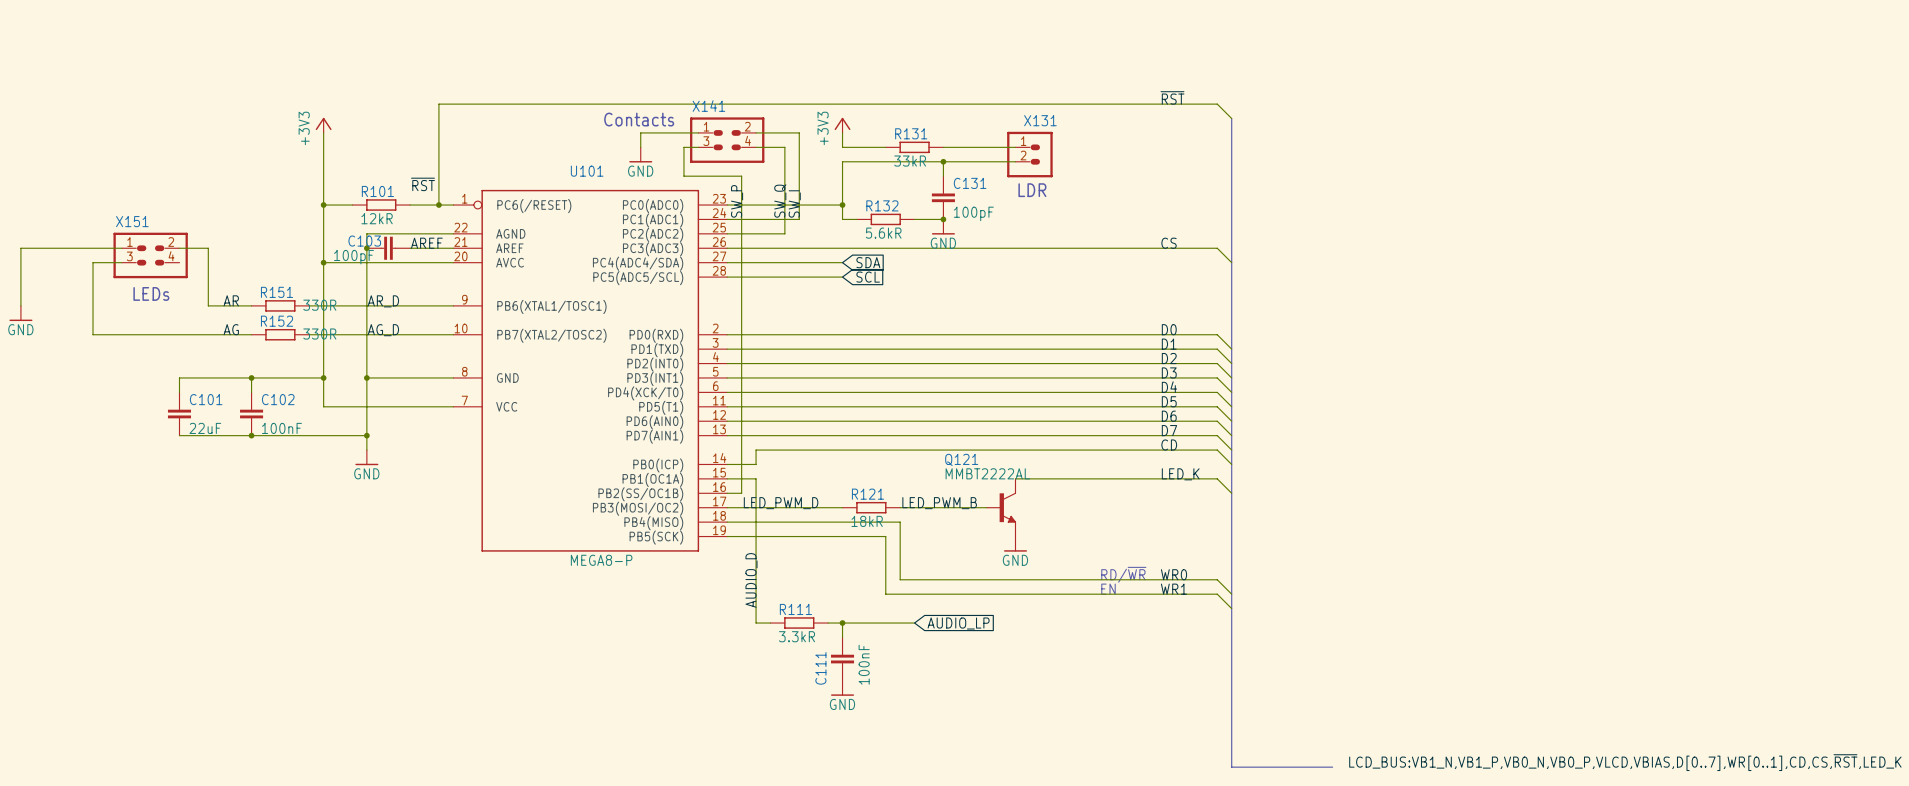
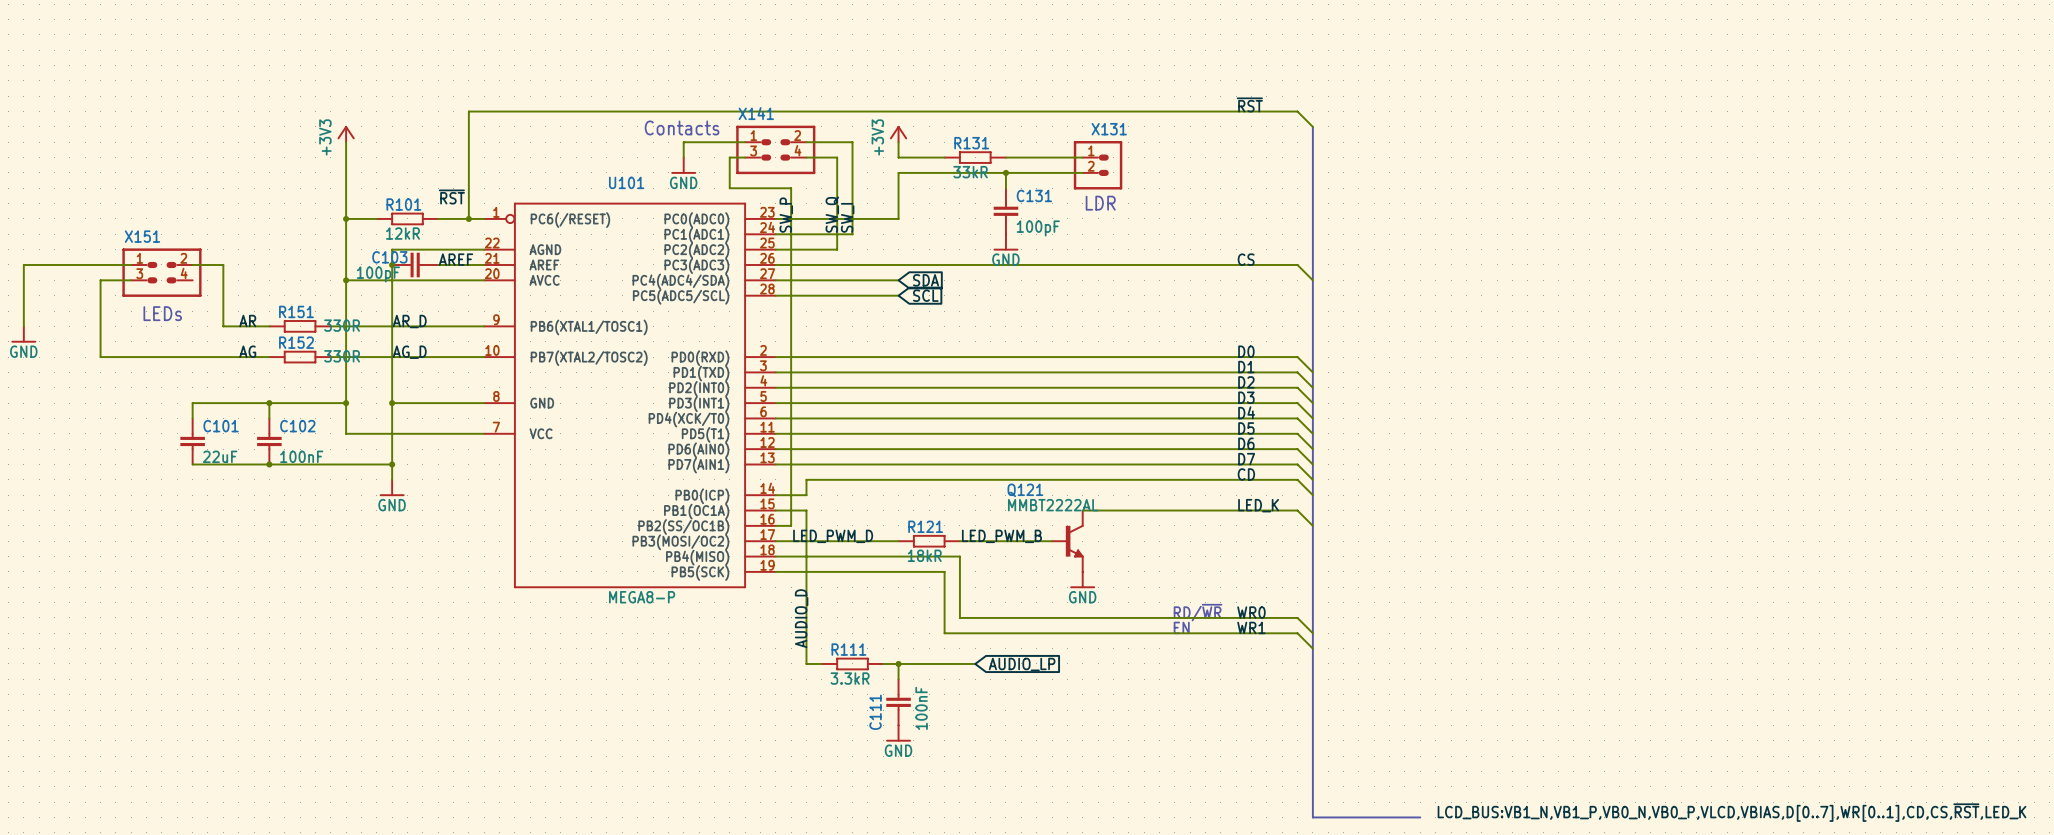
wire: (842, 205) (842, 219) (856, 219) -> none
junction: (842, 205) -> none
R132: 5.6kR (885, 219) -> none
wire: (914, 219) (943, 219) -> none
junction: (943, 219) -> none

